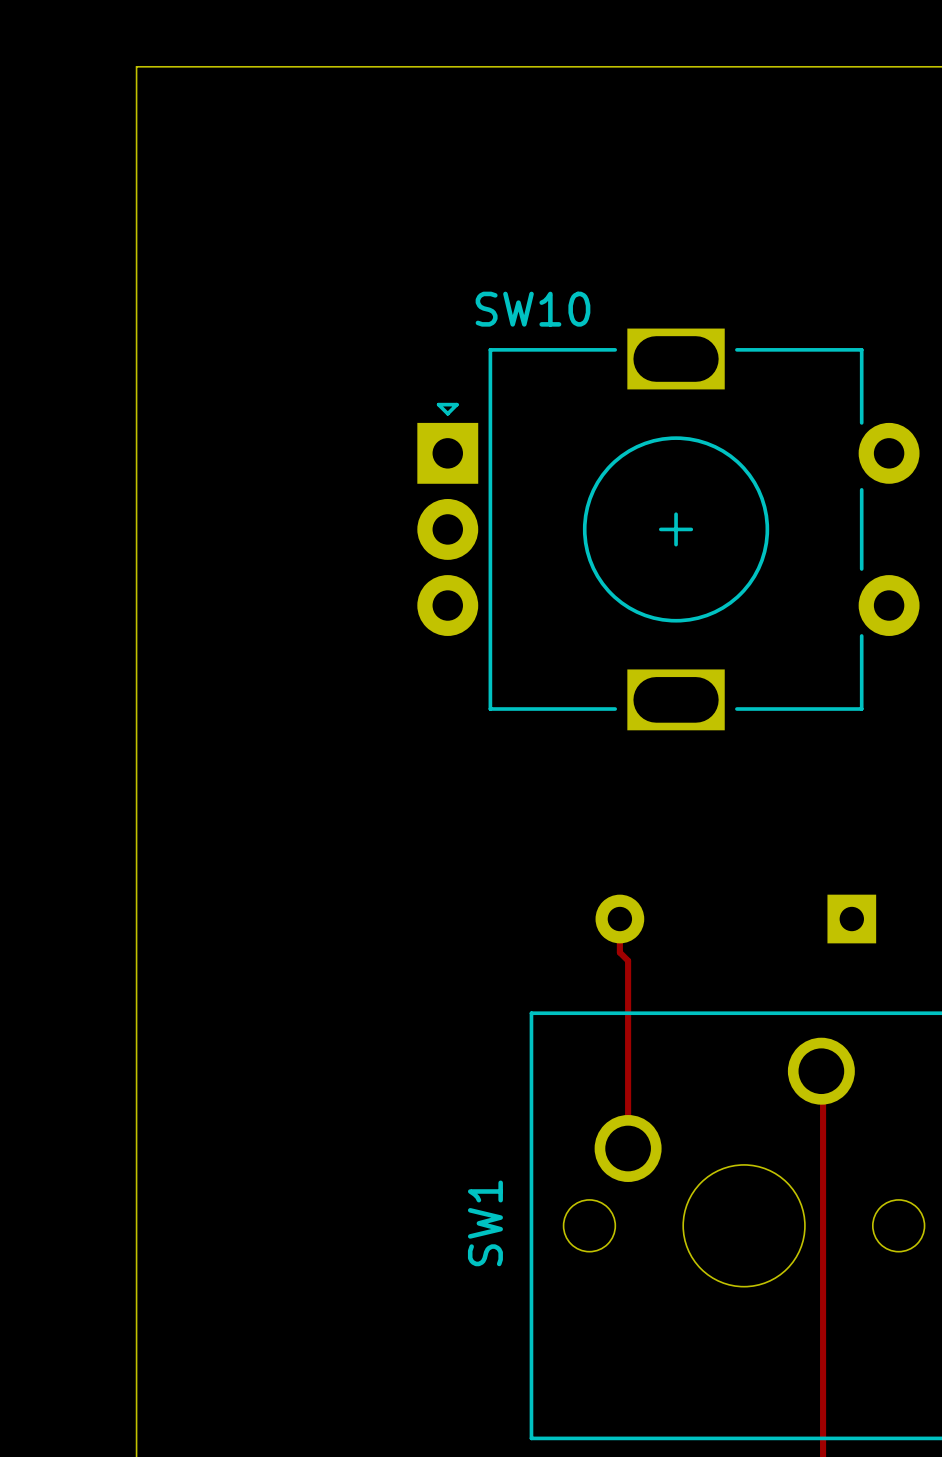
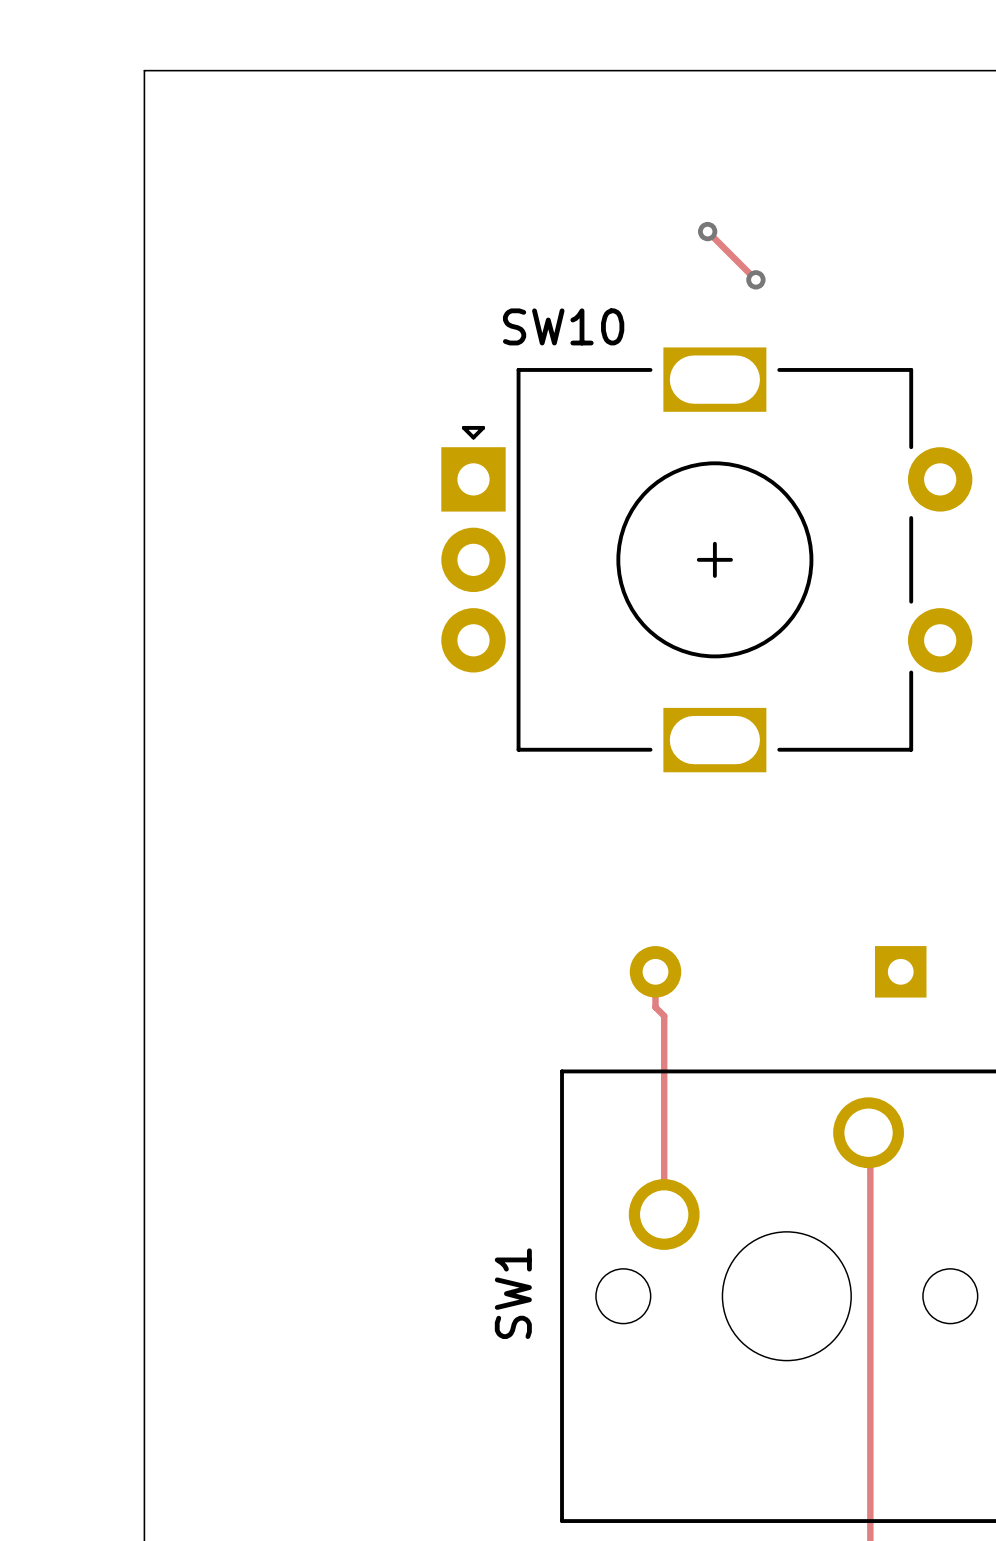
track: none -> (707, 231) (755, 279)
via: none -> (707, 231)
via: none -> (755, 279)

